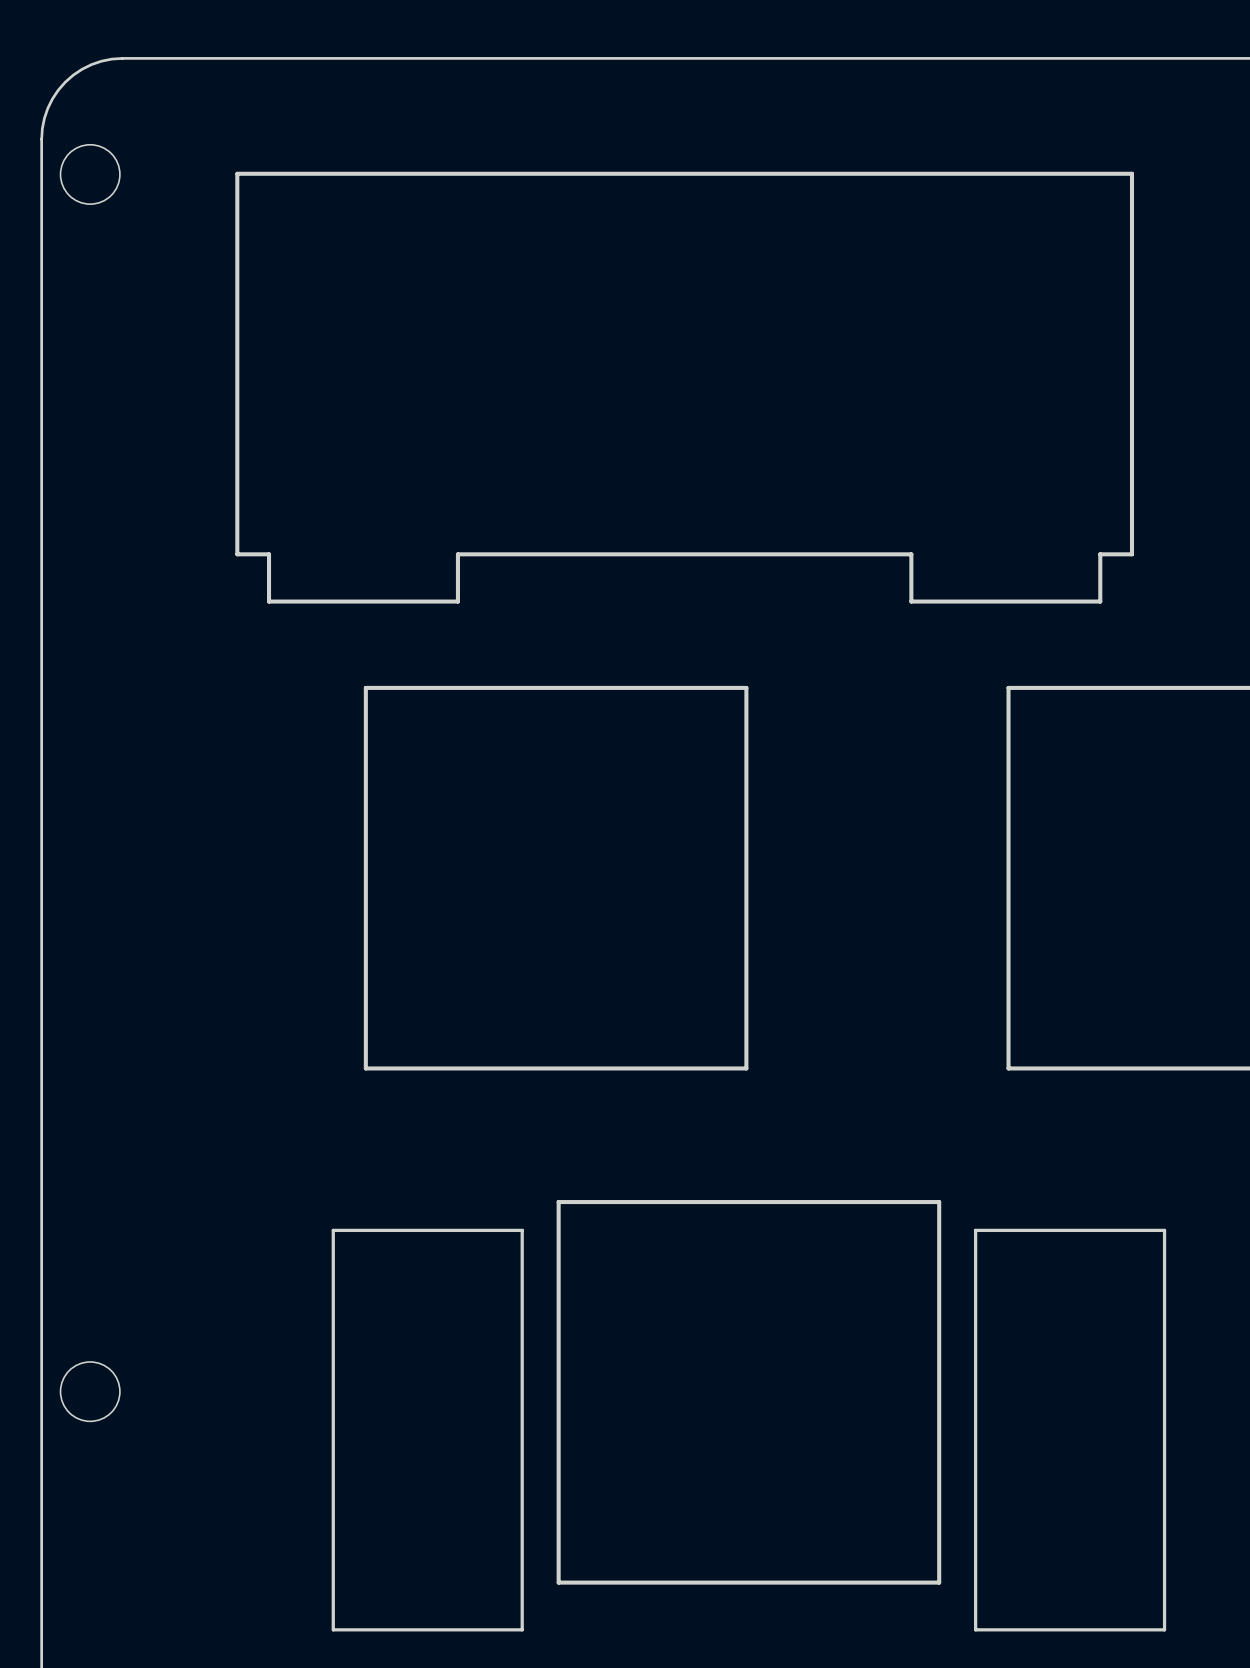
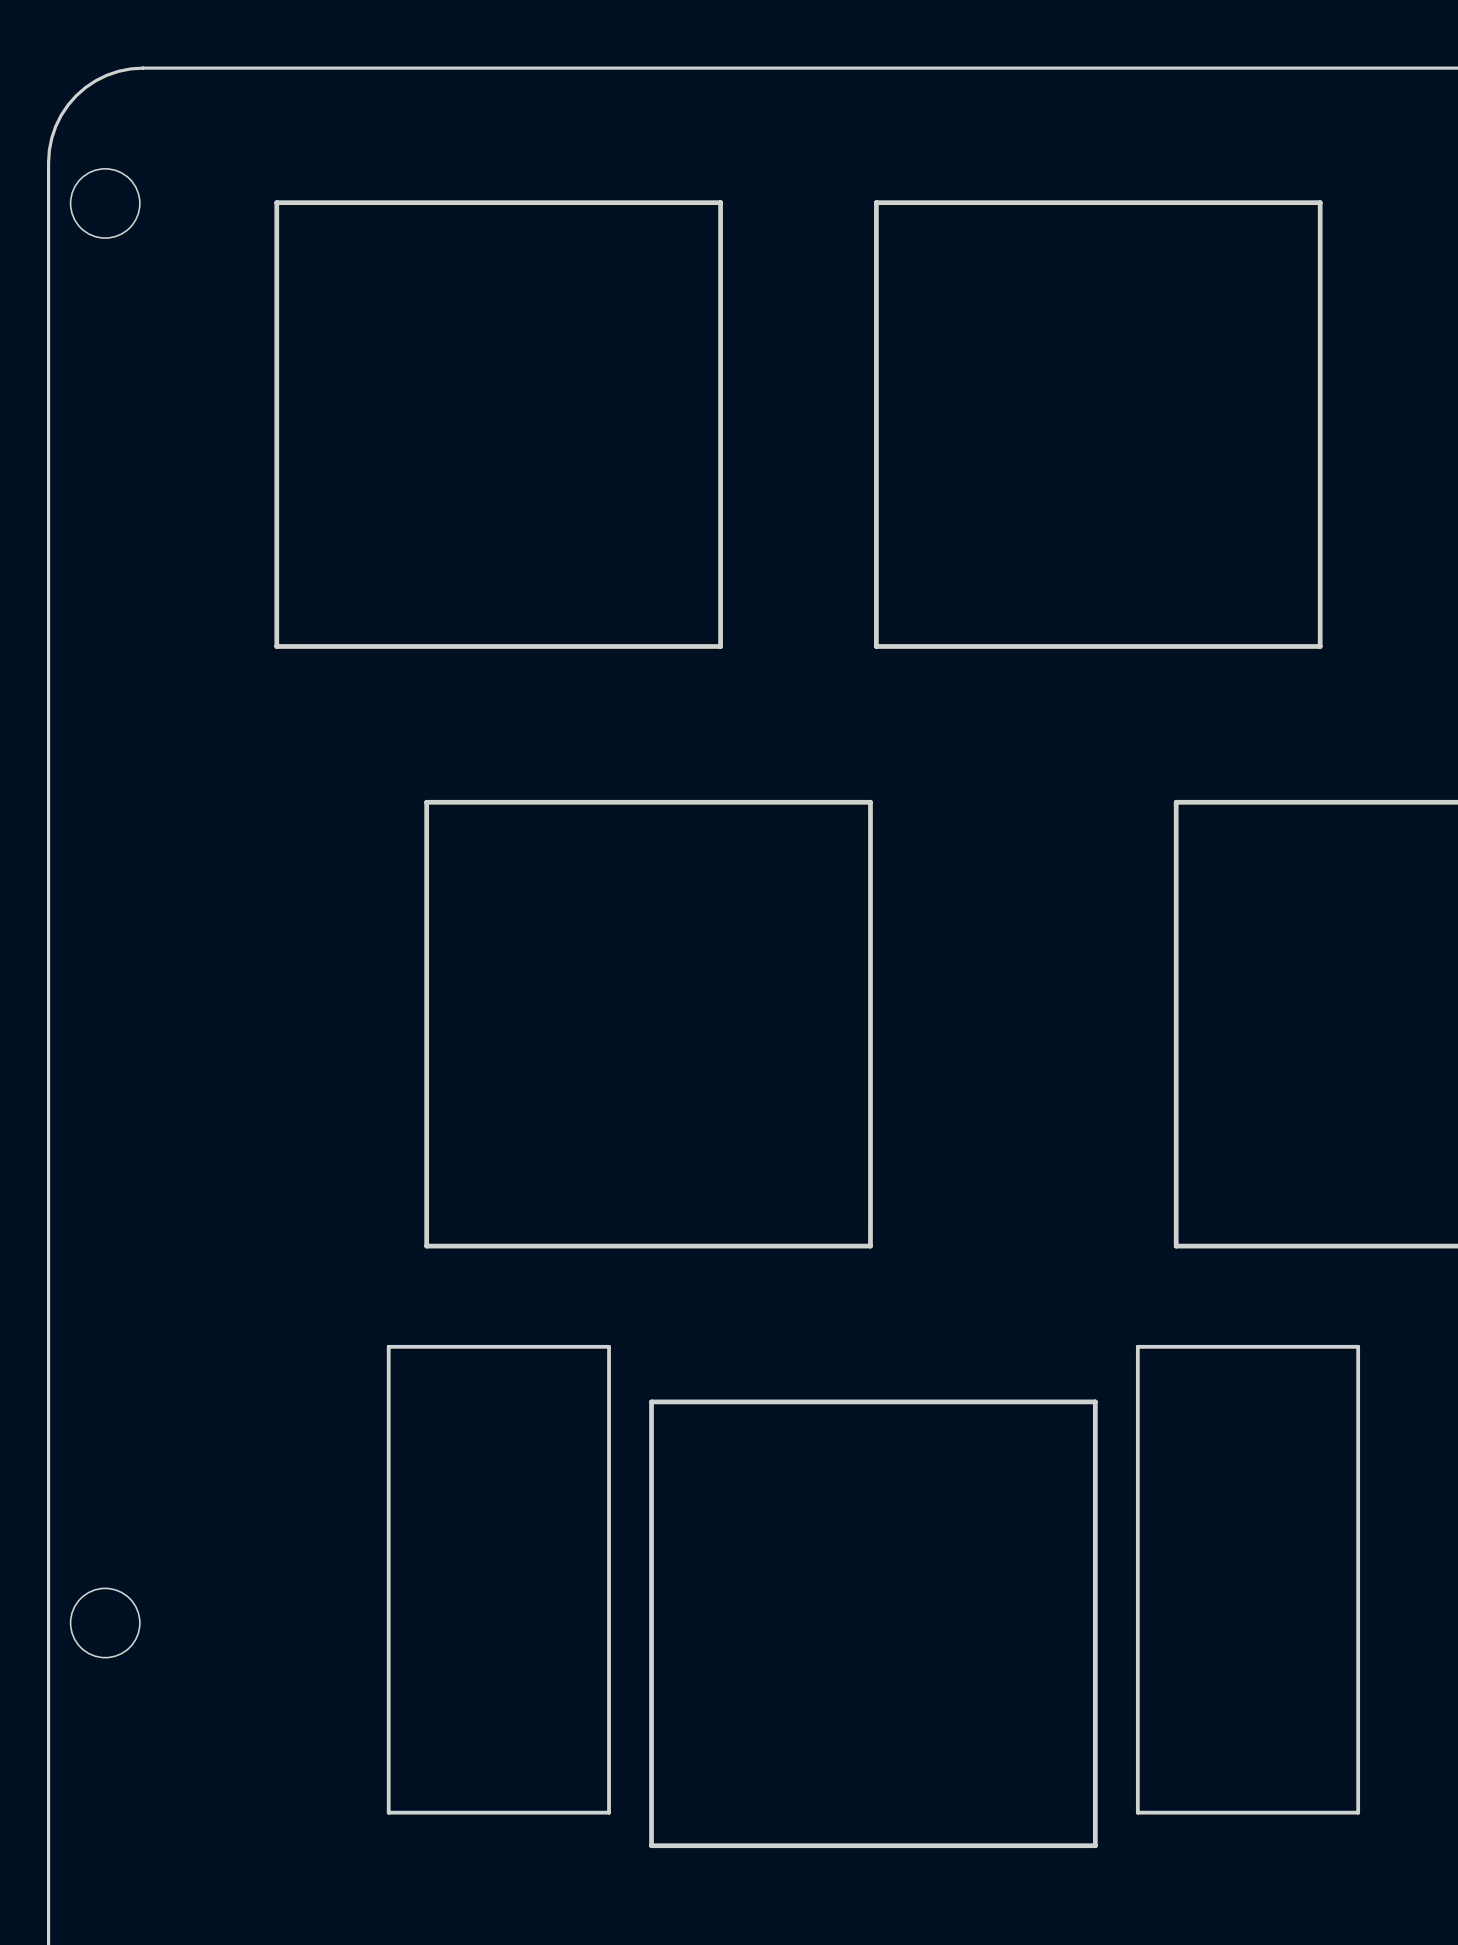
drawing: [235, 171, 1135, 604] -> none
drawing: none -> [274, 200, 723, 649]
drawing: none -> [874, 200, 1323, 649]
drawing: none -> [386, 1344, 1361, 1849]
drawing: [331, 1200, 1167, 1632] -> none

